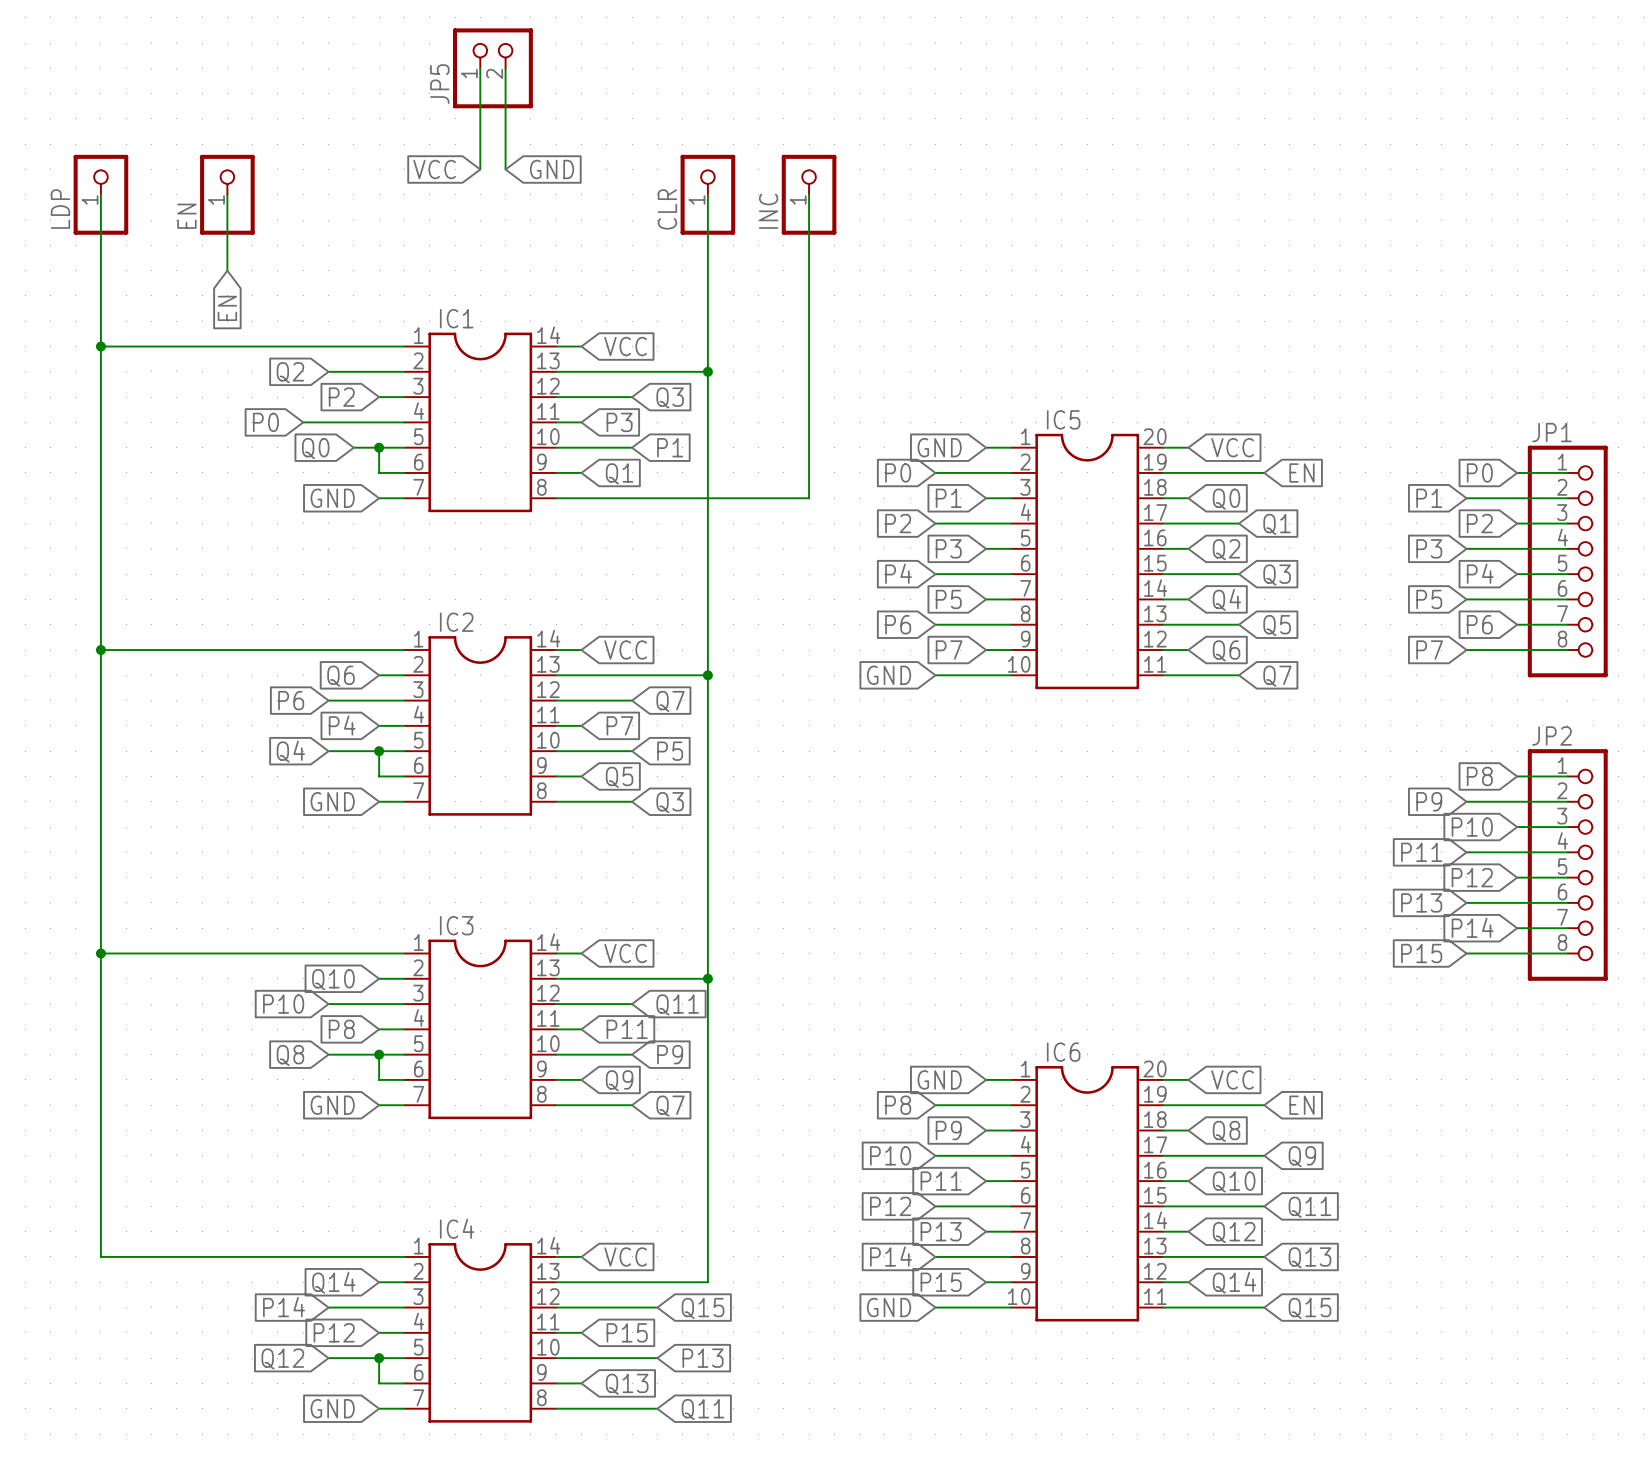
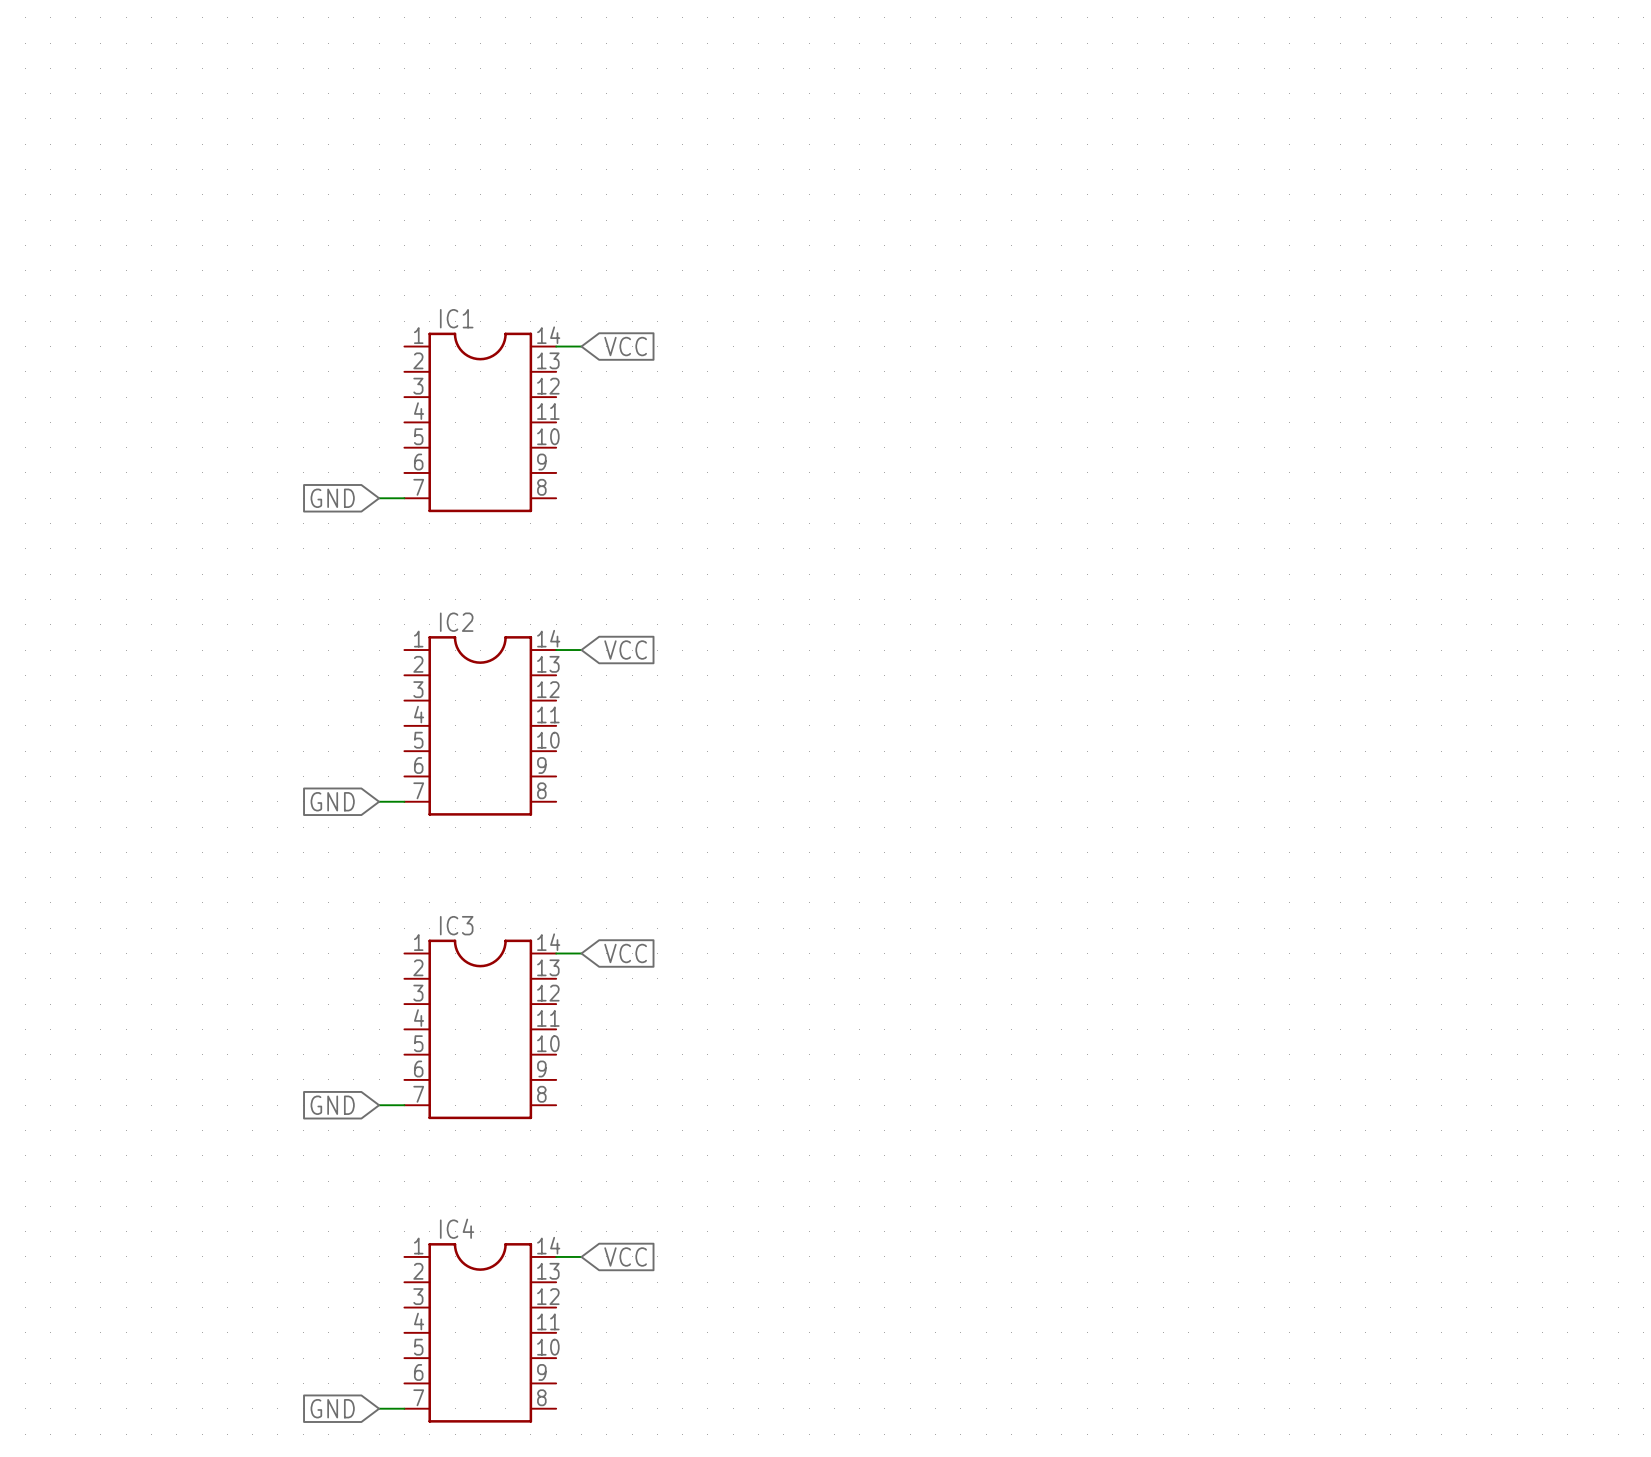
wire: (480, 68) (480, 169) -> none
JP5: (492, 68) -> none
wire: (505, 68) (505, 169) -> none
global label: VCC (434, 169) -> none
global label: GND (552, 169) -> none
wire: (100, 194) (100, 1256) (404, 1256) -> none
LDP: (100, 194) -> none
wire: (227, 194) (227, 270) -> none
EN: (227, 194) -> none
wire: (707, 194) (707, 1282) (556, 1282) -> none
CLR: (707, 194) -> none
wire: (809, 194) (809, 498) (556, 498) -> none
INC: (809, 194) -> none
global label: EN (227, 308) -> none
wire: (100, 346) (404, 346) -> none
junction: (100, 346) -> none
wire: (328, 371) (404, 371) -> none
wire: (556, 371) (707, 371) -> none
junction: (707, 371) -> none
global label: Q2 (290, 372) -> none
global label: P2 (341, 397) -> none
wire: (379, 397) (404, 397) -> none
wire: (556, 397) (632, 397) -> none
global label: Q3 (670, 397) -> none
global label: P0 (265, 422) -> none
wire: (303, 422) (404, 422) -> none
wire: (556, 422) (581, 422) -> none
global label: P3 (619, 422) -> none
wire: (353, 447) (404, 447) -> none
wire: (379, 447) (379, 472) (404, 472) -> none
junction: (379, 447) -> none
wire: (556, 447) (632, 447) -> none
global label: P1 (670, 447) -> none
global label: GND (939, 447) -> none
wire: (986, 447) (1011, 447) -> none
wire: (1163, 447) (1188, 447) -> none
global label: VCC (1232, 447) -> none
global label: Q0 (315, 448) -> none
wire: (556, 472) (581, 472) -> none
global label: P0 (898, 472) -> none
wire: (935, 472) (1011, 472) -> none
wire: (1163, 472) (1264, 472) -> none
global label: EN (1302, 472) -> none
global label: P0 (1479, 472) -> none
wire: (1517, 472) (1567, 472) -> none
global label: Q1 (619, 473) -> none
global label: P1 (948, 498) -> none
wire: (986, 498) (1011, 498) -> none
wire: (1163, 498) (1188, 498) -> none
global label: P1 (1429, 498) -> none
wire: (1466, 498) (1567, 498) -> none
global label: Q0 (1226, 499) -> none
global label: P2 (898, 523) -> none
wire: (935, 523) (1011, 523) -> none
wire: (1163, 523) (1238, 523) -> none
global label: P2 (1479, 523) -> none
wire: (1517, 523) (1567, 523) -> none
global label: Q1 (1277, 524) -> none
global label: P3 (948, 548) -> none
wire: (986, 548) (1011, 548) -> none
wire: (1163, 548) (1188, 548) -> none
global label: P3 (1429, 548) -> none
wire: (1466, 548) (1567, 548) -> none
global label: Q2 (1226, 549) -> none
IC5: (1087, 561) -> none
JP1: (1567, 561) -> none
global label: P4 (898, 573) -> none
global label: P4 (1480, 573) -> none
wire: (935, 574) (1011, 574) -> none
wire: (1163, 574) (1238, 574) -> none
global label: Q3 (1277, 574) -> none
wire: (1517, 574) (1567, 574) -> none
global label: P5 (948, 599) -> none
wire: (986, 599) (1011, 599) -> none
wire: (1163, 599) (1188, 599) -> none
global label: Q4 (1226, 599) -> none
global label: P5 (1429, 599) -> none
wire: (1466, 599) (1567, 599) -> none
global label: P6 (898, 624) -> none
wire: (935, 624) (1011, 624) -> none
wire: (1163, 624) (1238, 624) -> none
global label: P6 (1479, 624) -> none
wire: (1517, 624) (1567, 624) -> none
global label: Q5 (1277, 625) -> none
wire: (100, 650) (404, 650) -> none
junction: (100, 650) -> none
global label: P7 (949, 650) -> none
wire: (986, 650) (1011, 650) -> none
wire: (1163, 650) (1188, 650) -> none
global label: Q6 (1226, 650) -> none
global label: P7 (1429, 650) -> none
wire: (1466, 650) (1567, 650) -> none
wire: (379, 675) (404, 675) -> none
wire: (556, 675) (707, 675) -> none
junction: (707, 675) -> none
global label: GND (889, 675) -> none
wire: (935, 675) (1011, 675) -> none
wire: (1163, 675) (1238, 675) -> none
global label: Q6 (341, 676) -> none
global label: Q7 (1277, 676) -> none
global label: P6 (291, 700) -> none
wire: (328, 700) (404, 700) -> none
wire: (556, 700) (632, 700) -> none
global label: Q7 (670, 701) -> none
global label: P4 (342, 725) -> none
wire: (379, 725) (404, 725) -> none
wire: (556, 725) (581, 725) -> none
global label: P7 (619, 725) -> none
global label: Q4 (290, 751) -> none
wire: (328, 751) (404, 751) -> none
wire: (379, 751) (379, 776) (404, 776) -> none
junction: (379, 751) -> none
wire: (556, 751) (632, 751) -> none
global label: P5 (670, 751) -> none
wire: (556, 776) (581, 776) -> none
global label: P8 (1479, 776) -> none
wire: (1517, 776) (1567, 776) -> none
global label: Q5 (619, 777) -> none
wire: (556, 801) (632, 801) -> none
global label: P9 (1429, 801) -> none
wire: (1466, 801) (1567, 801) -> none
global label: Q3 (670, 802) -> none
global label: P10 (1472, 827) -> none
wire: (1517, 827) (1567, 827) -> none
global label: P11 (1421, 852) -> none
wire: (1466, 852) (1567, 852) -> none
JP2: (1567, 864) -> none
global label: P12 (1472, 877) -> none
wire: (1517, 877) (1567, 877) -> none
global label: P13 (1421, 902) -> none
wire: (1466, 902) (1567, 902) -> none
global label: P14 (1472, 927) -> none
wire: (1517, 928) (1567, 928) -> none
wire: (100, 953) (404, 953) -> none
junction: (100, 953) -> none
global label: P15 (1421, 953) -> none
wire: (1466, 953) (1567, 953) -> none
wire: (379, 978) (404, 978) -> none
wire: (556, 978) (707, 978) -> none
junction: (707, 978) -> none
global label: Q10 (333, 979) -> none
global label: P10 (283, 1004) -> none
wire: (328, 1004) (404, 1004) -> none
wire: (556, 1004) (632, 1004) -> none
global label: Q11 (677, 1004) -> none
global label: P8 (341, 1029) -> none
wire: (379, 1029) (404, 1029) -> none
wire: (556, 1029) (581, 1029) -> none
global label: P11 (627, 1029) -> none
wire: (328, 1054) (404, 1054) -> none
wire: (379, 1054) (379, 1079) (404, 1079) -> none
junction: (379, 1054) -> none
wire: (556, 1054) (632, 1054) -> none
global label: P9 (670, 1054) -> none
global label: Q8 (290, 1055) -> none
wire: (556, 1079) (581, 1079) -> none
global label: GND (939, 1079) -> none
wire: (986, 1079) (1011, 1079) -> none
wire: (1163, 1079) (1188, 1079) -> none
global label: VCC (1232, 1079) -> none
global label: Q9 (619, 1080) -> none
wire: (556, 1105) (632, 1105) -> none
global label: P8 (898, 1105) -> none
wire: (935, 1105) (1011, 1105) -> none
wire: (1163, 1105) (1264, 1105) -> none
global label: EN (1302, 1105) -> none
global label: Q7 (670, 1106) -> none
global label: P9 (948, 1130) -> none
wire: (986, 1130) (1011, 1130) -> none
wire: (1163, 1130) (1188, 1130) -> none
global label: Q8 (1226, 1131) -> none
global label: P10 (890, 1155) -> none
wire: (935, 1155) (1011, 1155) -> none
wire: (1163, 1155) (1264, 1155) -> none
global label: Q9 (1302, 1156) -> none
global label: P11 (941, 1181) -> none
wire: (986, 1181) (1011, 1181) -> none
wire: (1163, 1181) (1188, 1181) -> none
global label: Q10 (1234, 1181) -> none
IC6: (1087, 1193) -> none
global label: P12 (890, 1206) -> none
wire: (935, 1206) (1011, 1206) -> none
wire: (1163, 1206) (1264, 1206) -> none
global label: Q11 (1309, 1207) -> none
global label: P13 (941, 1231) -> none
wire: (986, 1231) (1011, 1231) -> none
wire: (1163, 1231) (1188, 1231) -> none
global label: Q12 (1234, 1232) -> none
global label: P14 (890, 1256) -> none
wire: (935, 1256) (1011, 1256) -> none
wire: (1163, 1256) (1264, 1256) -> none
global label: Q13 (1309, 1257) -> none
global label: Q14 (333, 1282) -> none
wire: (379, 1282) (404, 1282) -> none
global label: P15 (941, 1282) -> none
wire: (986, 1282) (1011, 1282) -> none
wire: (1163, 1282) (1188, 1282) -> none
global label: Q14 (1234, 1282) -> none
global label: P14 (283, 1307) -> none
wire: (328, 1307) (404, 1307) -> none
wire: (556, 1307) (657, 1307) -> none
global label: GND (889, 1307) -> none
wire: (935, 1307) (1011, 1307) -> none
wire: (1163, 1307) (1264, 1307) -> none
global label: Q15 (703, 1308) -> none
global label: Q15 (1309, 1308) -> none
global label: P12 (334, 1332) -> none
wire: (379, 1332) (404, 1332) -> none
wire: (556, 1332) (581, 1332) -> none
global label: P15 (627, 1332) -> none
global label: Q12 (282, 1358) -> none
wire: (328, 1358) (404, 1358) -> none
wire: (379, 1358) (379, 1383) (404, 1383) -> none
junction: (379, 1358) -> none
wire: (556, 1358) (657, 1358) -> none
global label: P13 (703, 1358) -> none
wire: (556, 1383) (581, 1383) -> none
global label: Q13 (627, 1384) -> none
wire: (556, 1408) (657, 1408) -> none
global label: Q11 (703, 1409) -> none

